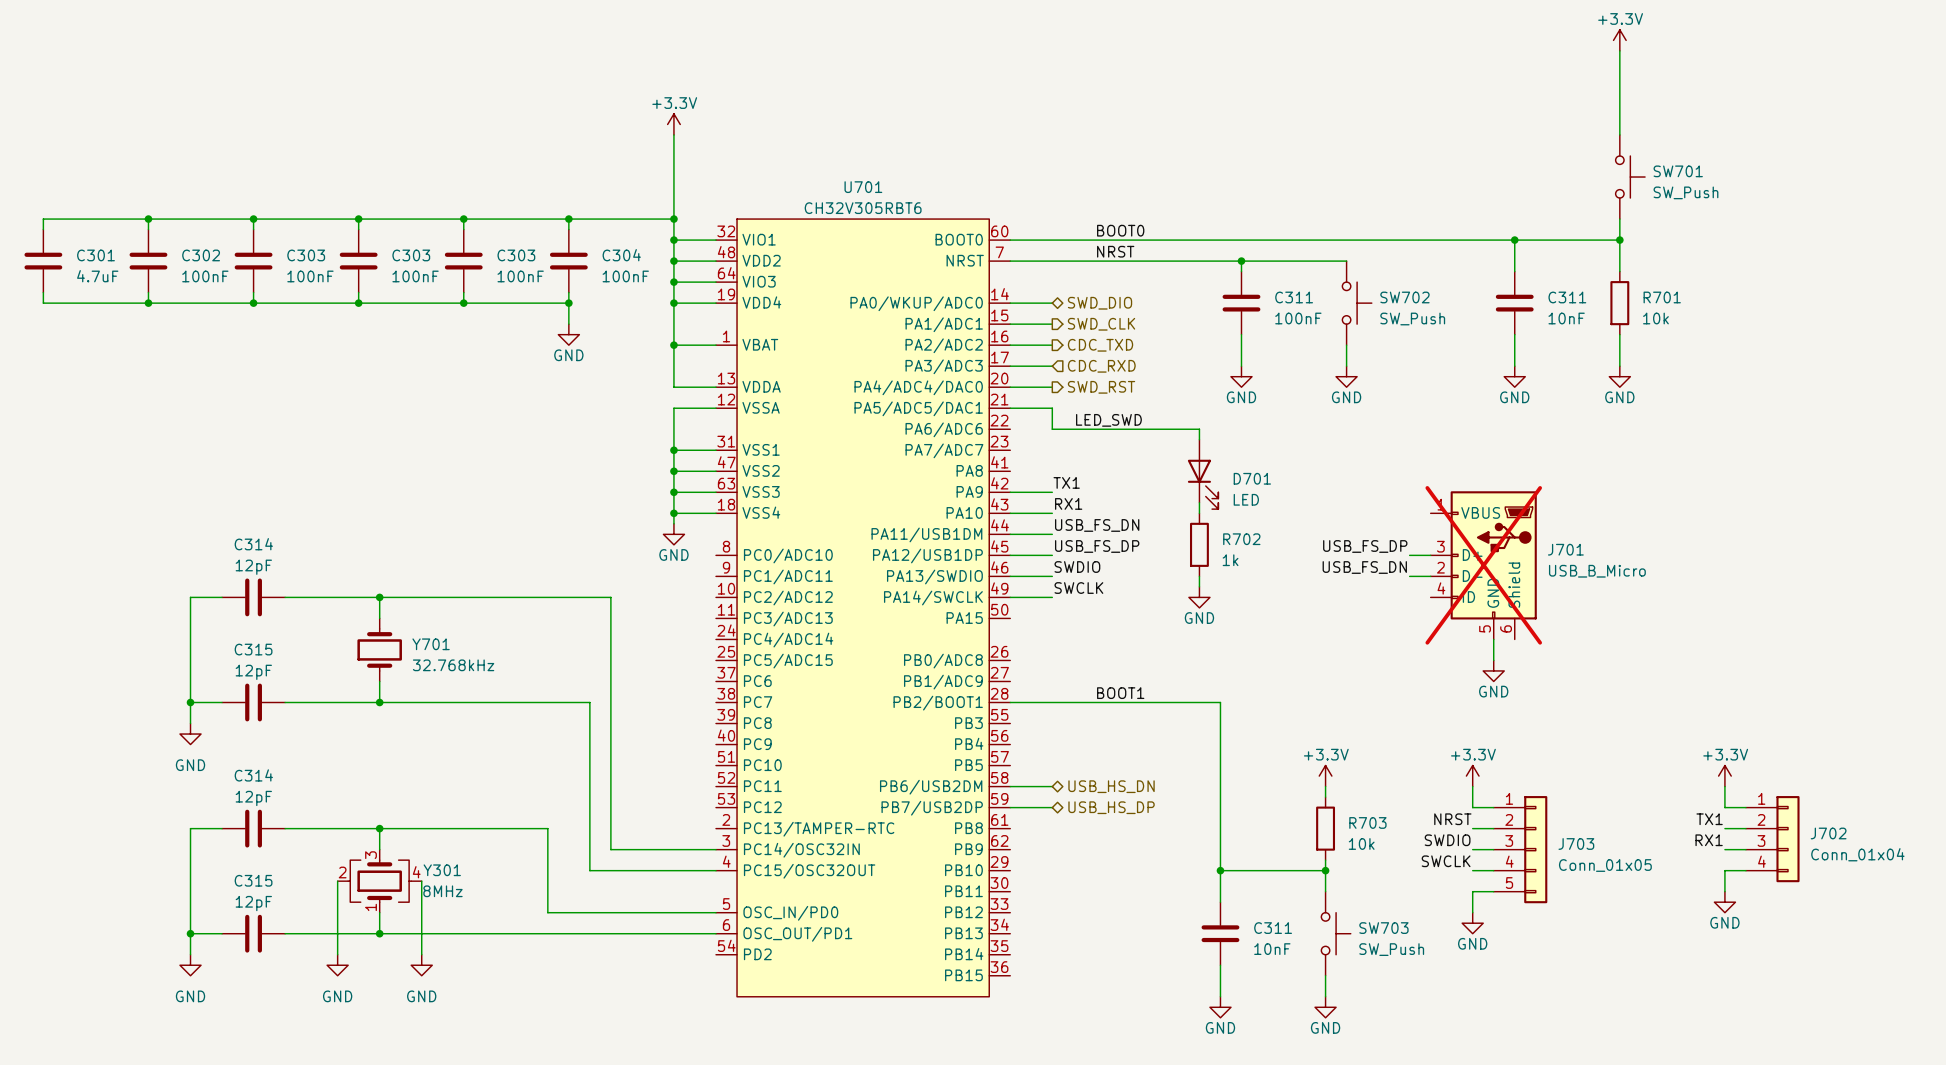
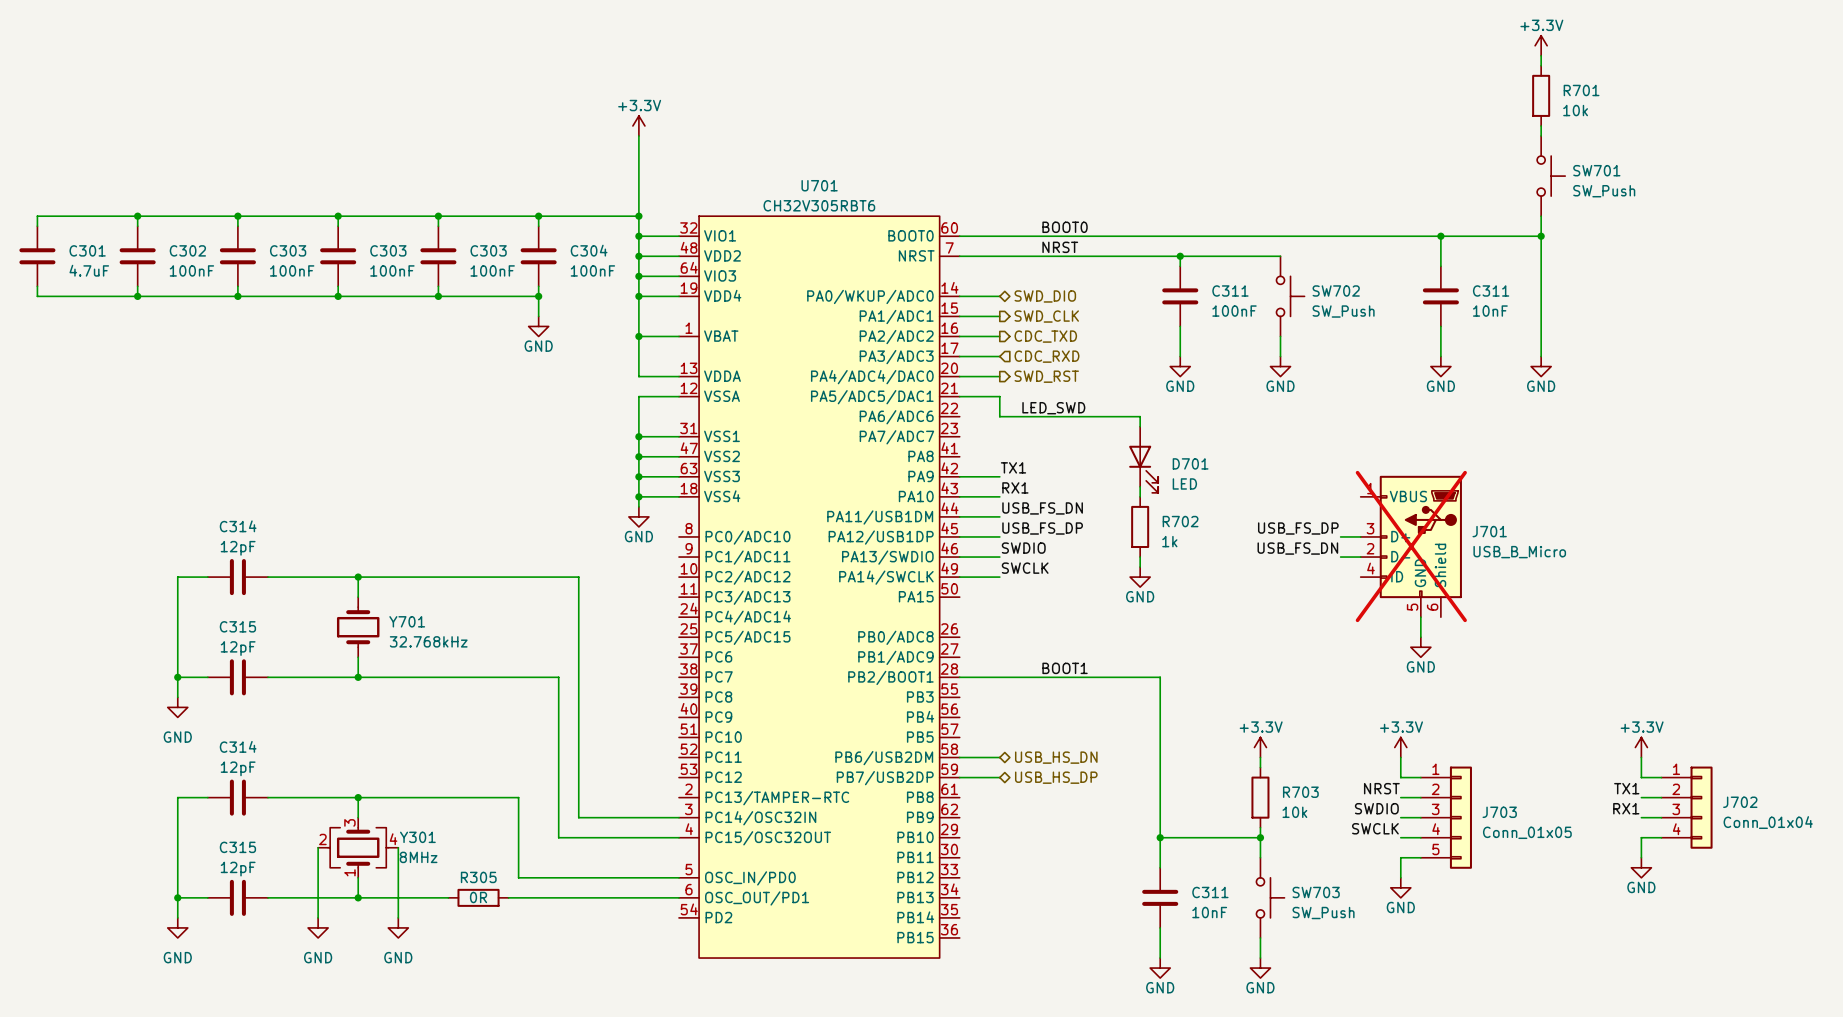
wire: (1619, 61) (1619, 124) -> none
wire: none -> (1541, 266) (1541, 326)
R701 position: (1619, 303) -> (1541, 95)
wire: (474, 933) (537, 933) -> none
R305: none -> 0R (478, 897)

